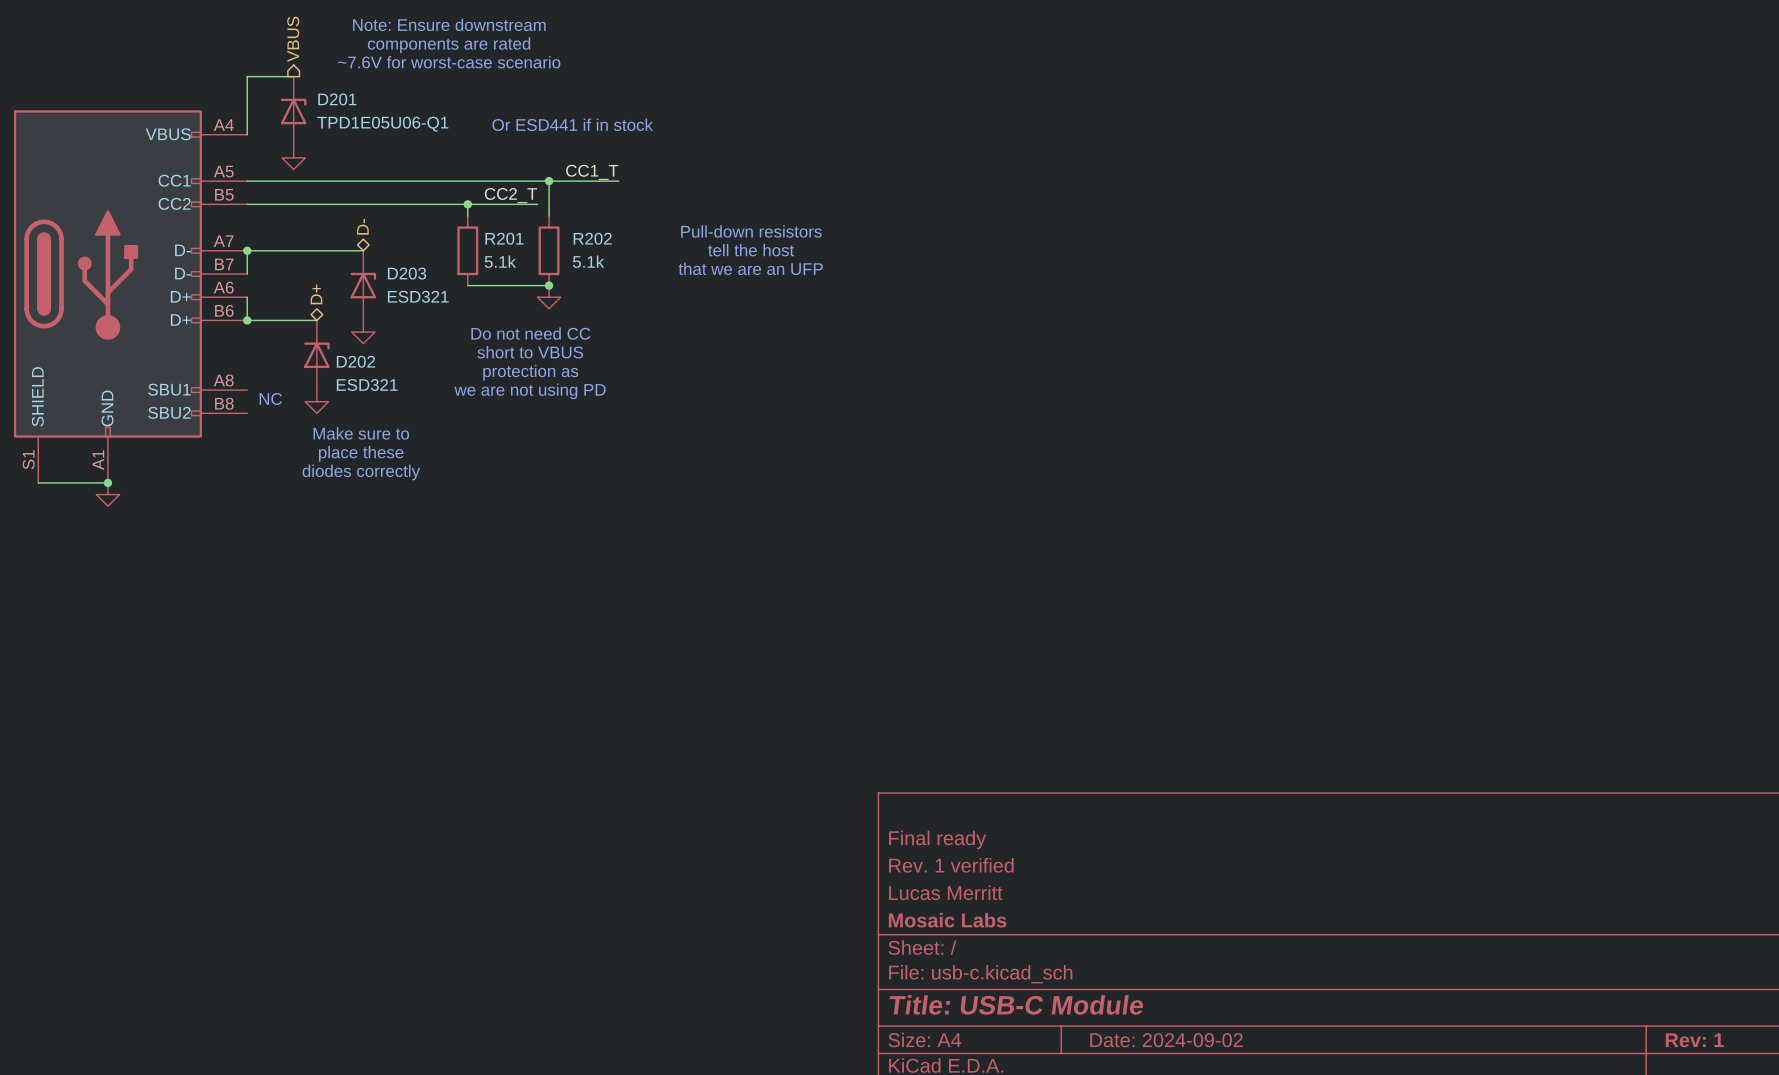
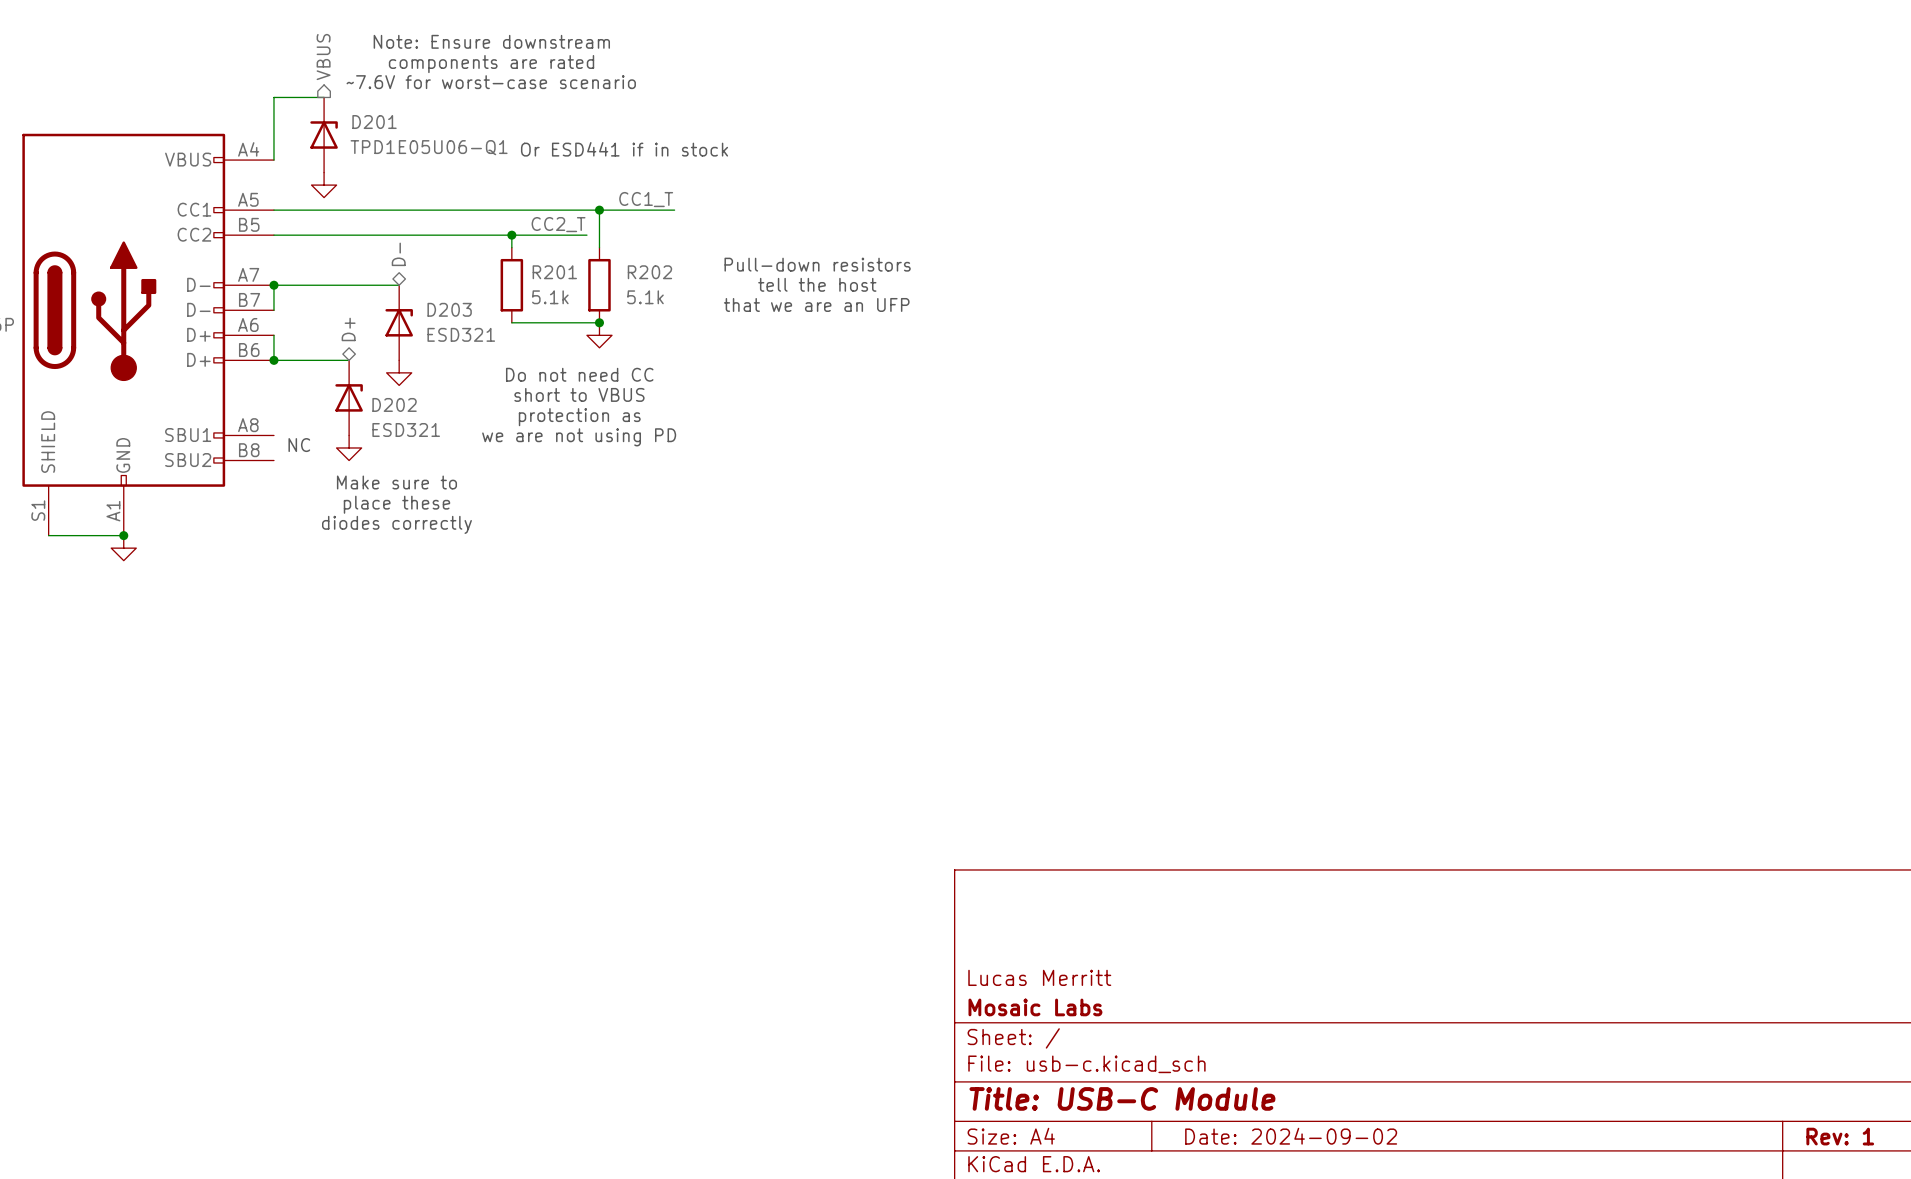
title block: Final ready (937, 839) -> none
title block: Rev. 1 verified (951, 865) -> none

